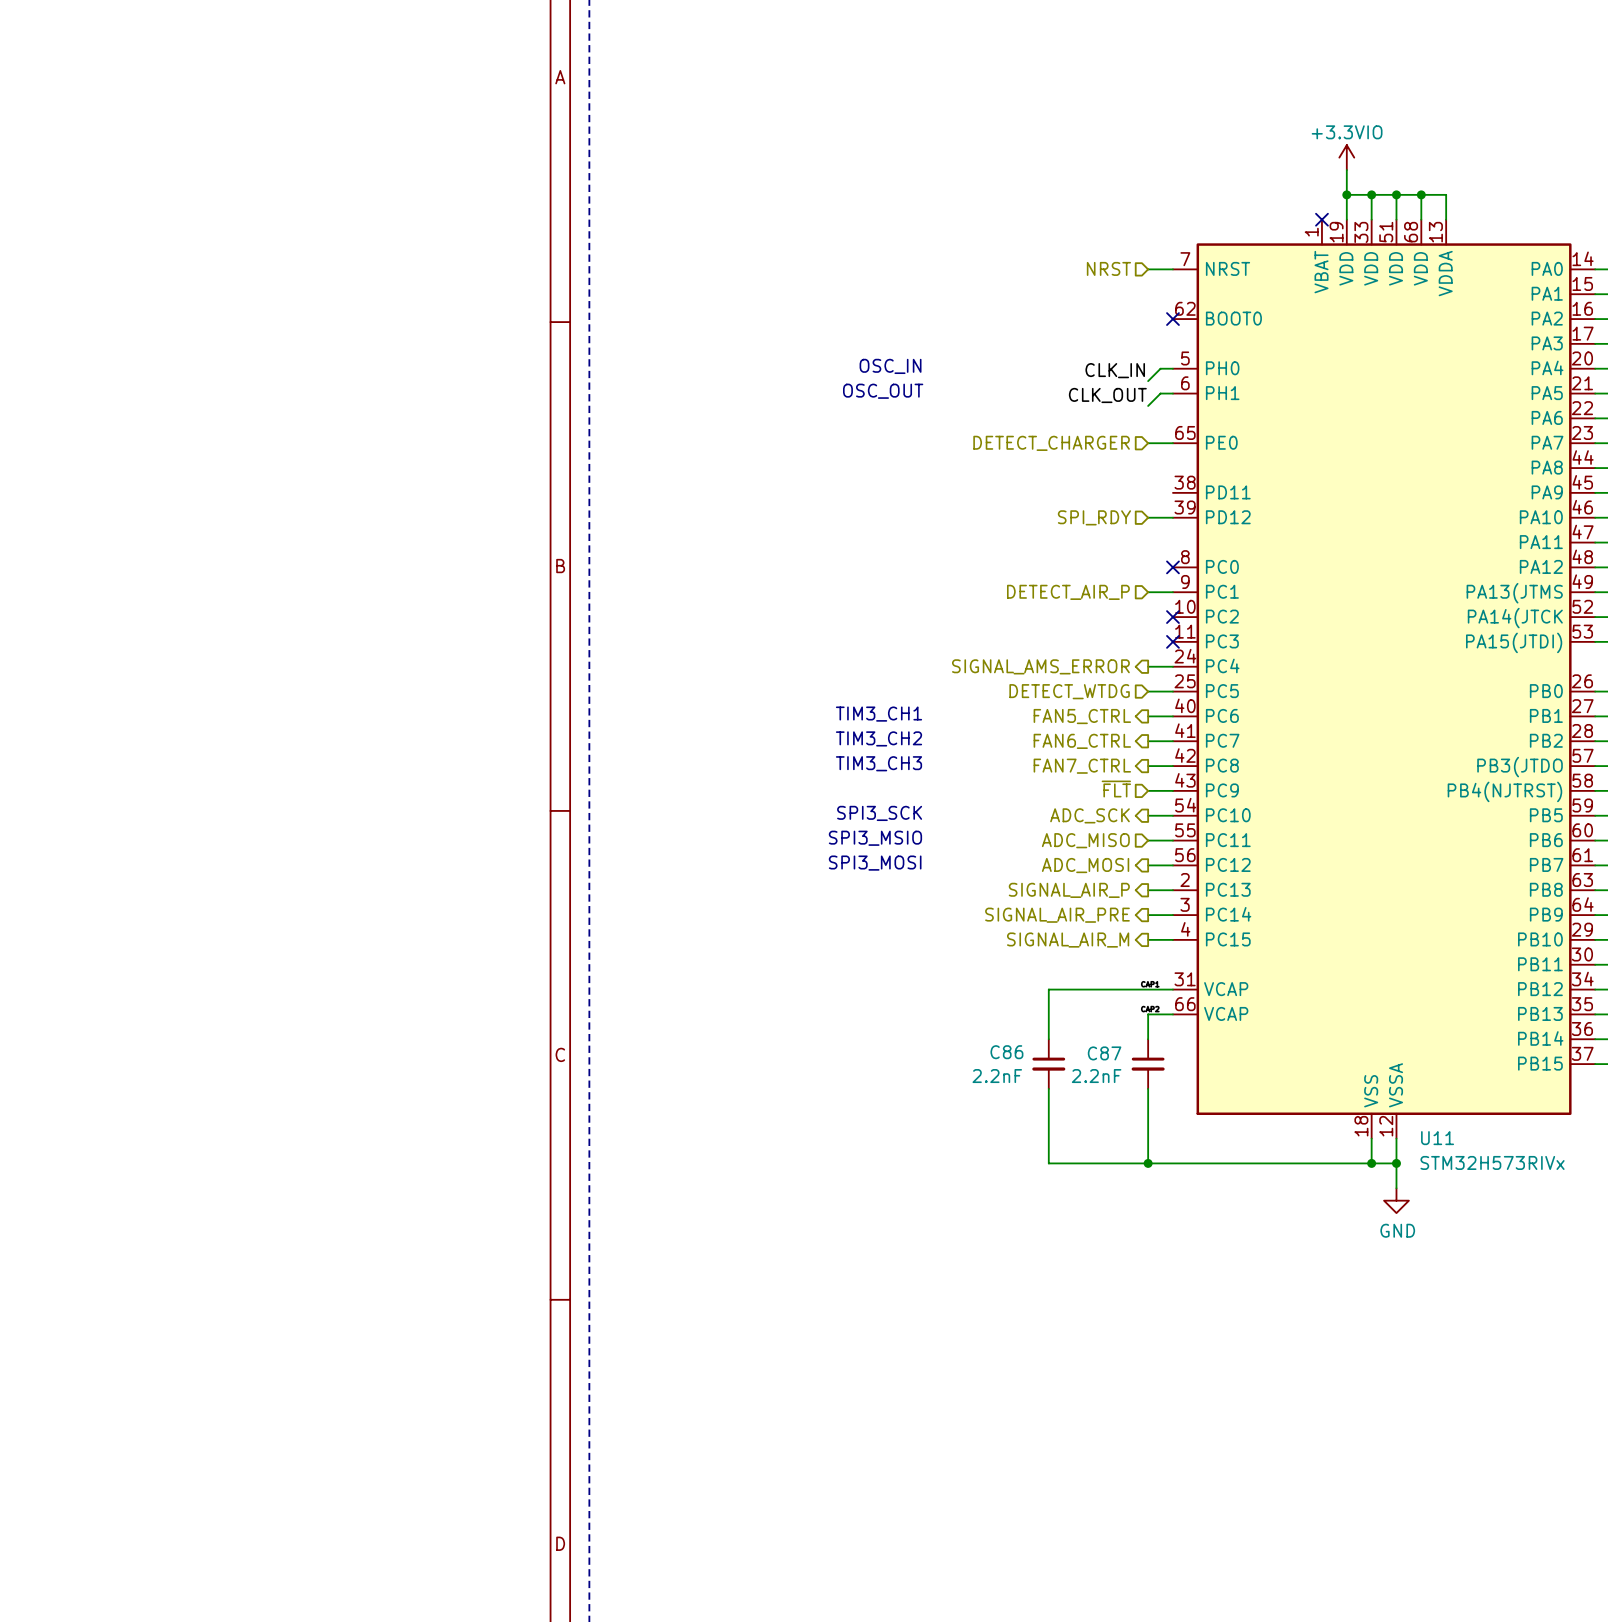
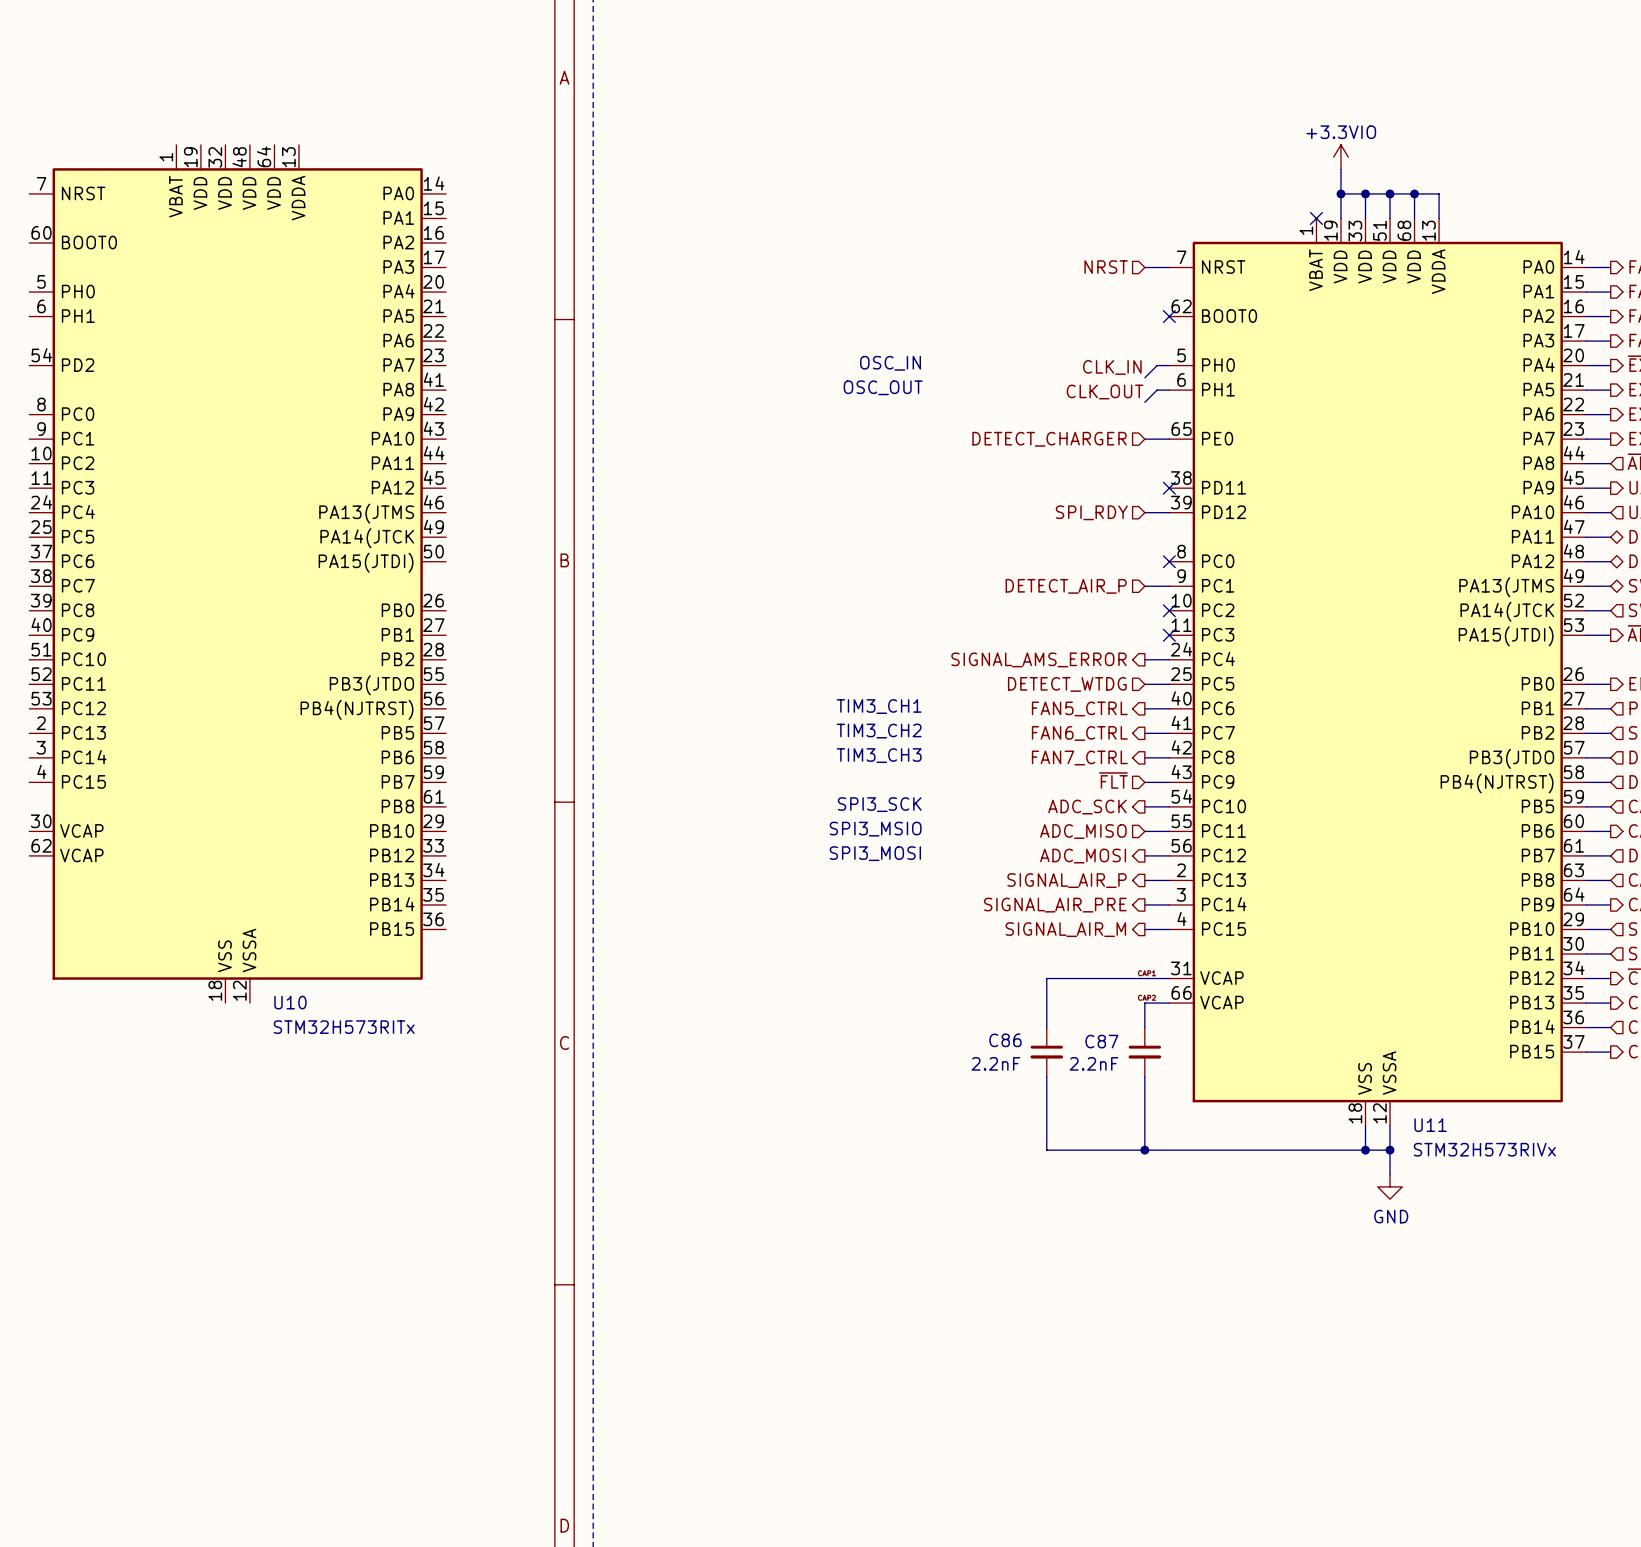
no-connect mark: none -> (1169, 488)
U10: none -> STM32H573RITx (237, 573)

